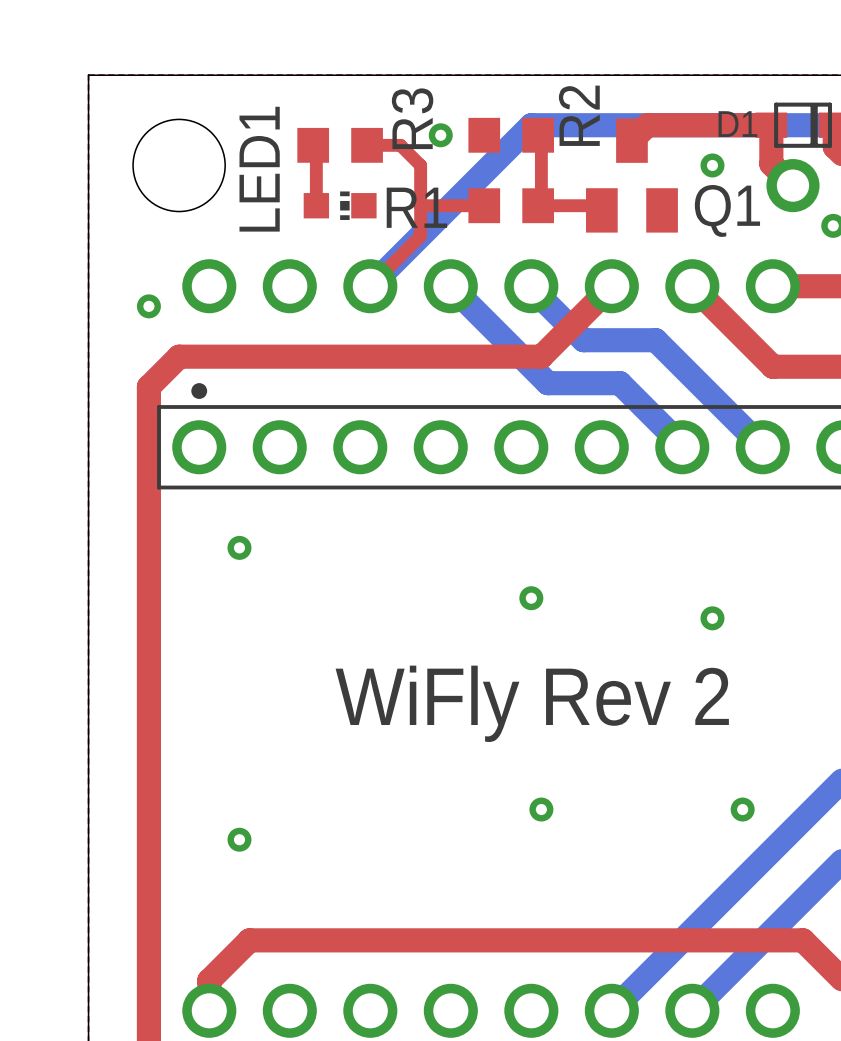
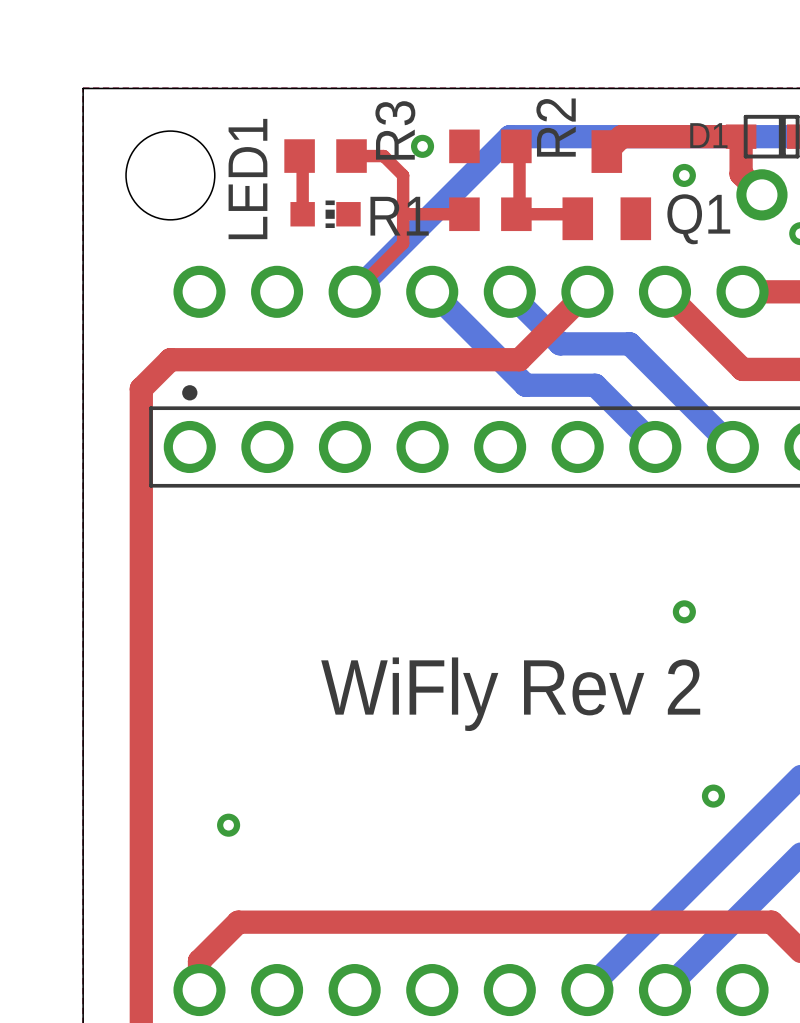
via: (148, 306) -> none
via: (239, 547) -> none
via: (531, 598) -> none
via: (541, 809) -> none

